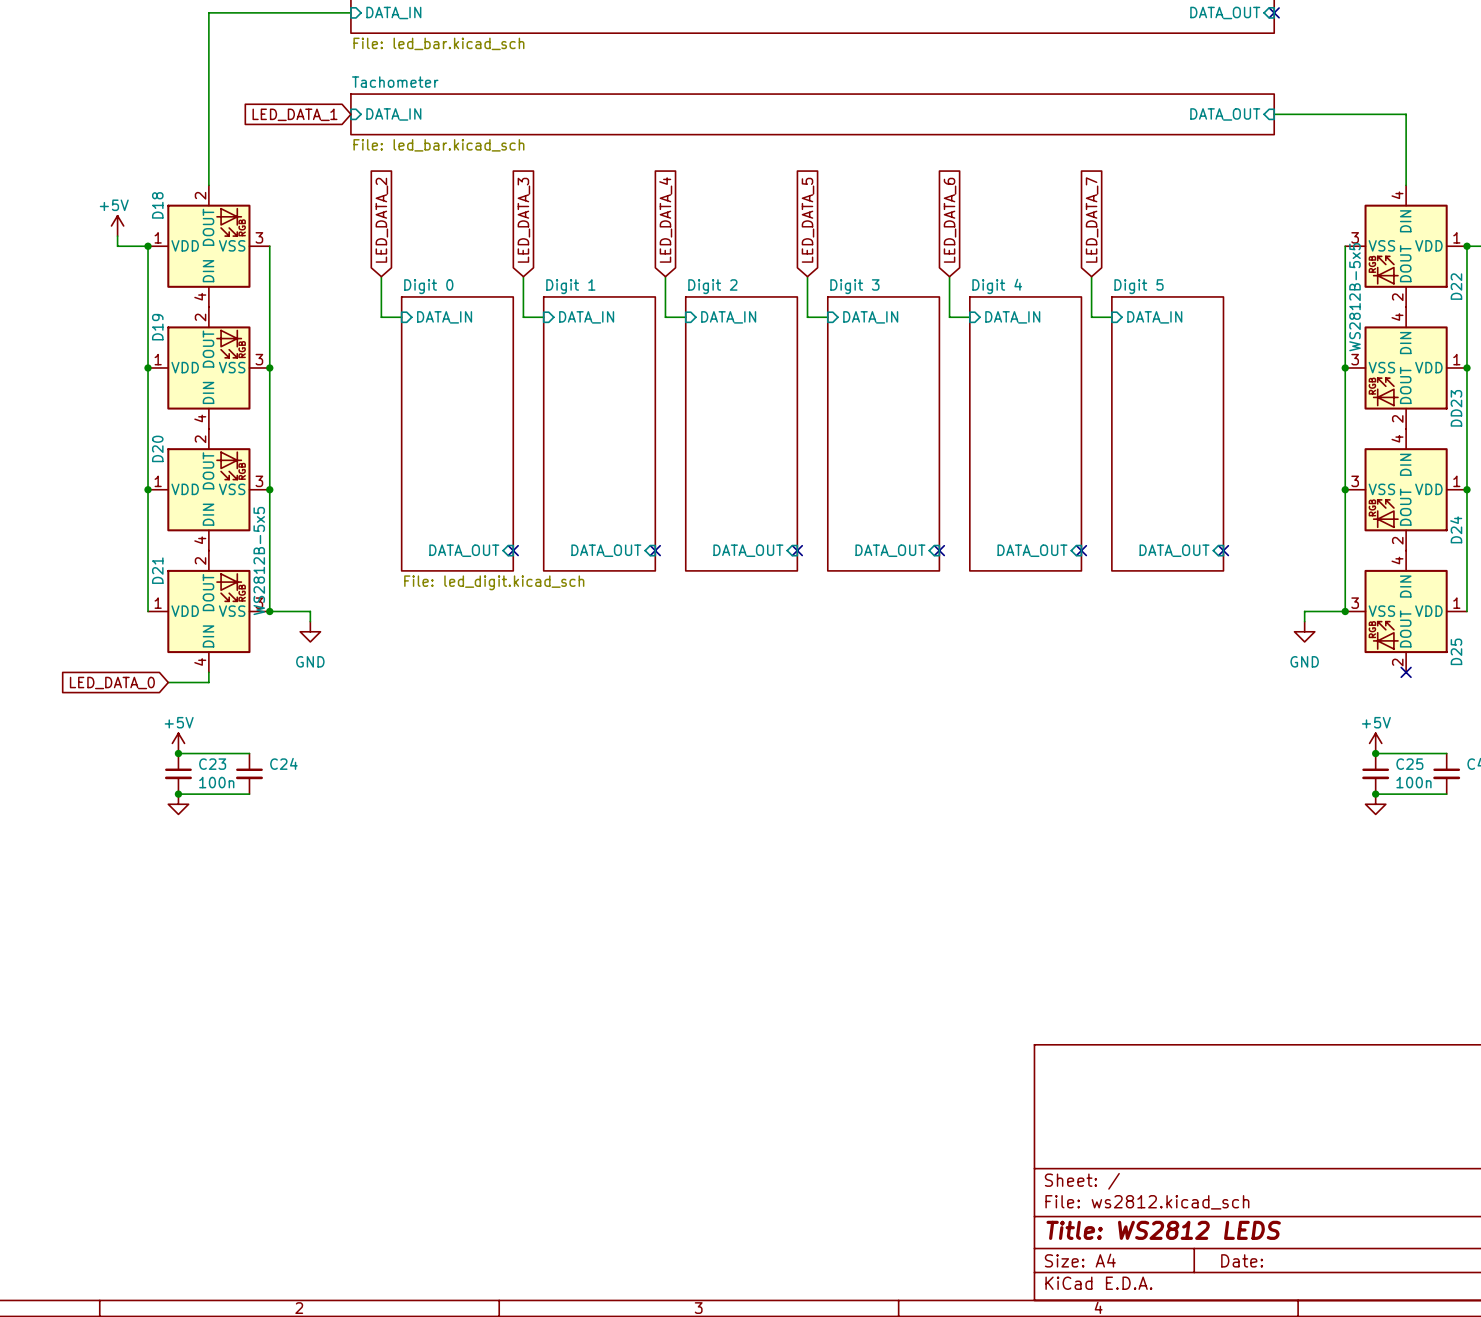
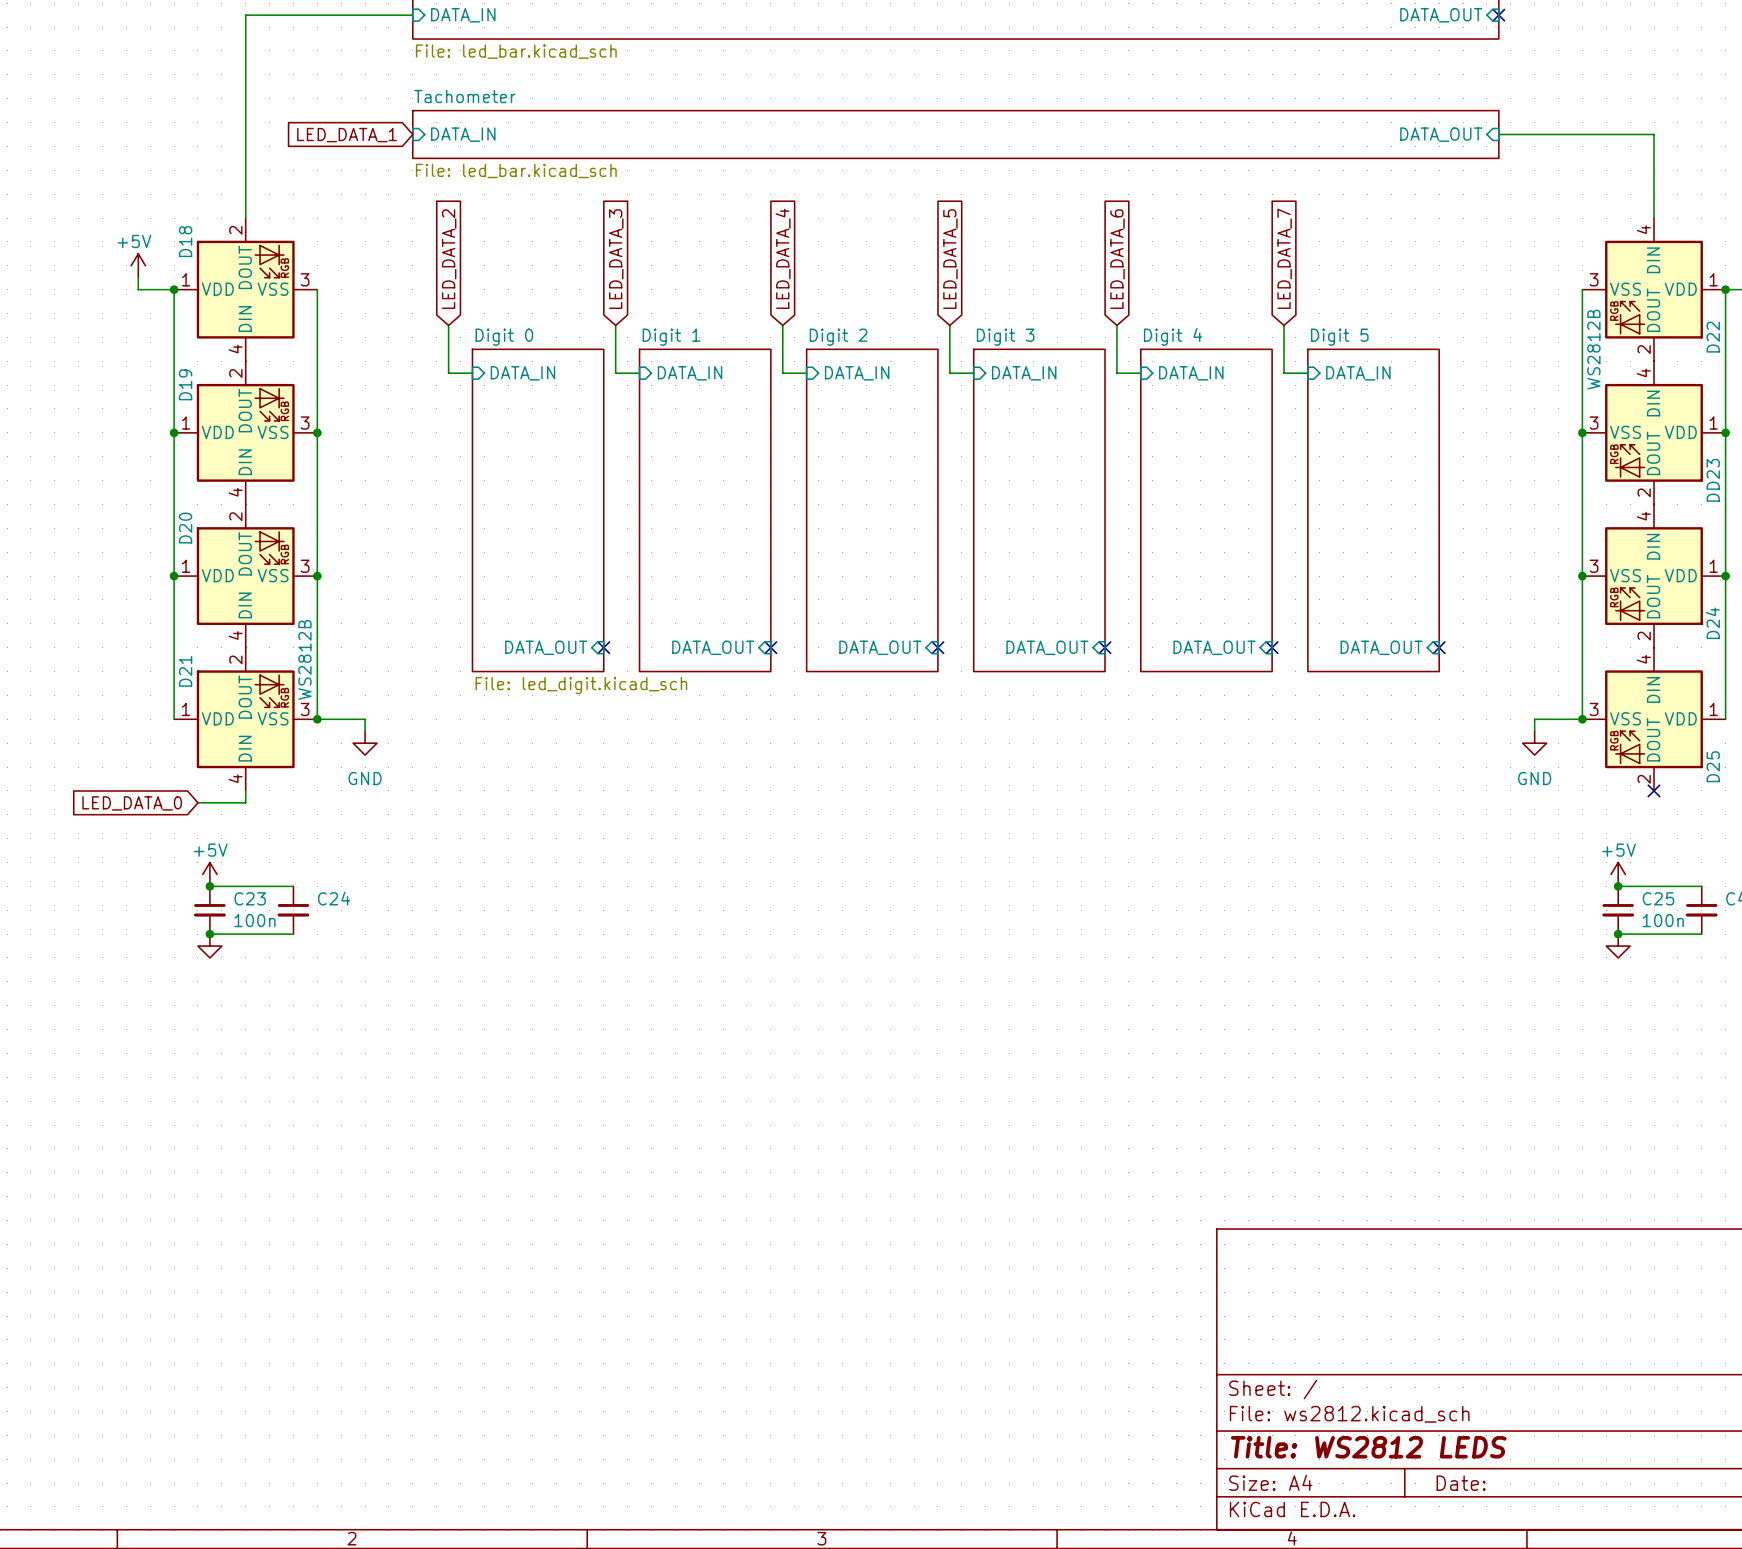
D22 value: WS2812B-5x5 (1355, 297) -> WS2812B (1593, 349)
D21 value: WS2812B-5x5 (259, 561) -> WS2812B (304, 659)

